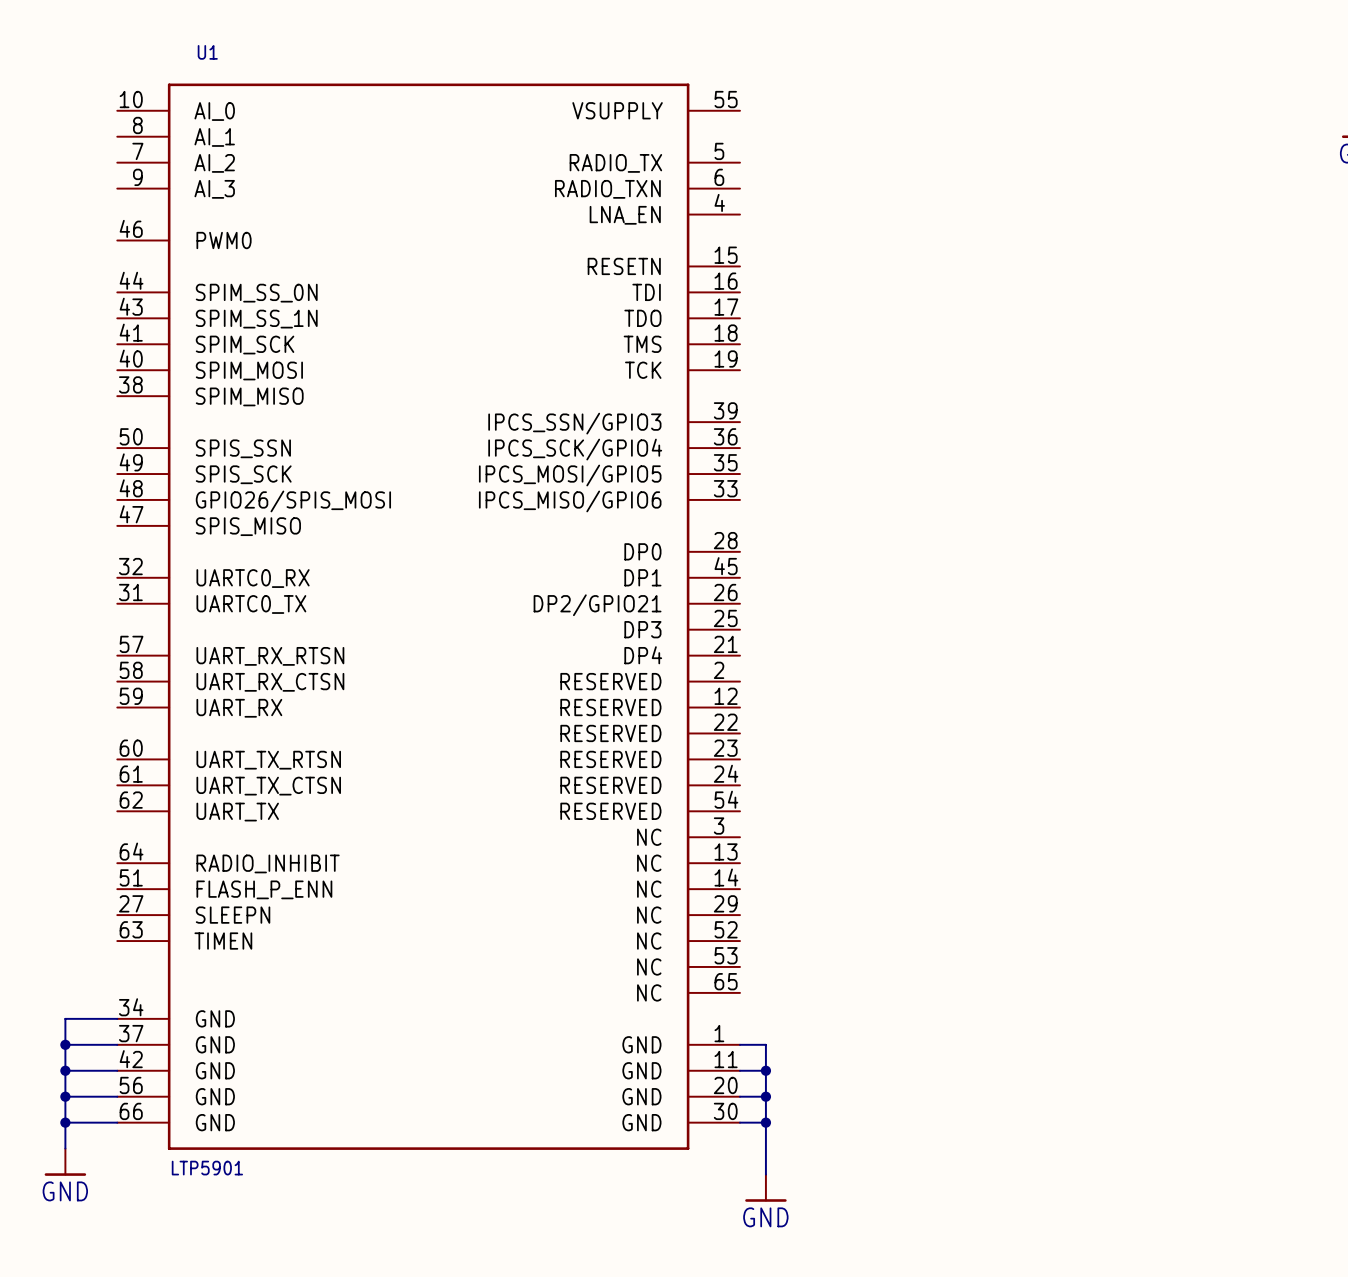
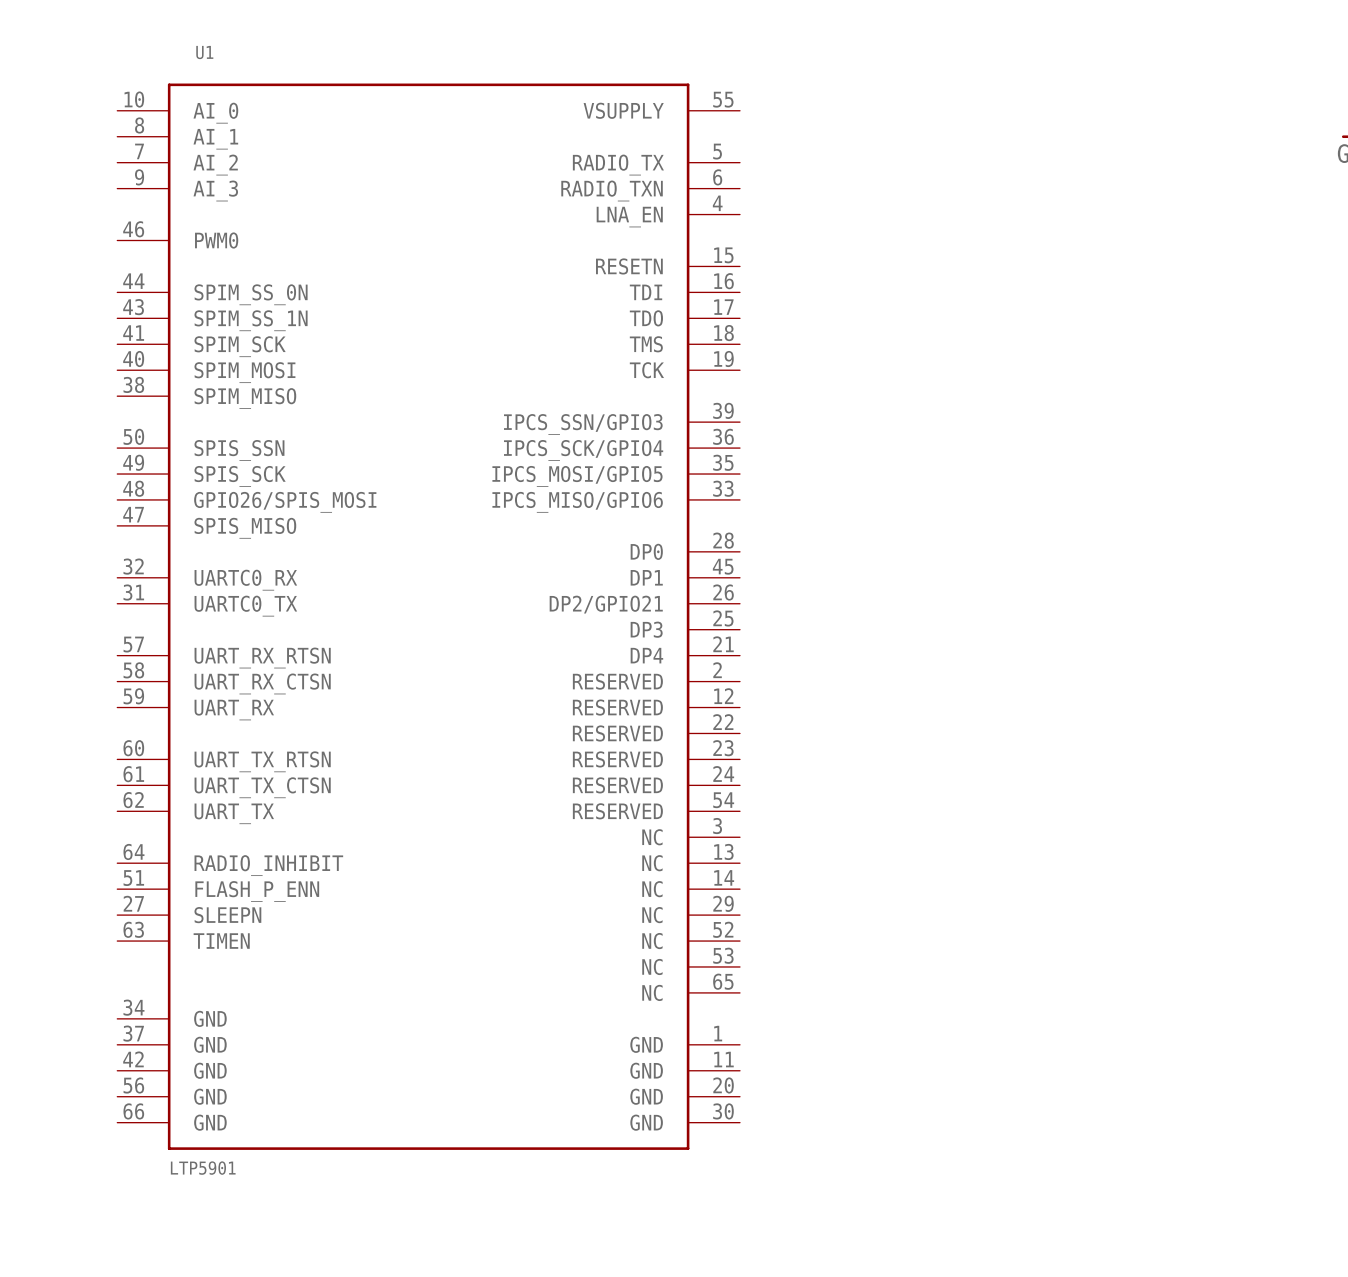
wire: (117, 1018) (65, 1018) (65, 1148) -> none
wire: (65, 1044) (117, 1044) -> none
junction: (65, 1044) -> none
wire: (739, 1044) (765, 1044) (765, 1174) -> none
wire: (65, 1070) (117, 1070) -> none
junction: (65, 1070) -> none
wire: (739, 1070) (765, 1070) -> none
junction: (765, 1070) -> none
wire: (65, 1096) (117, 1096) -> none
junction: (65, 1096) -> none
wire: (739, 1096) (765, 1096) -> none
junction: (765, 1096) -> none
wire: (65, 1122) (117, 1122) -> none
junction: (65, 1122) -> none
wire: (739, 1122) (765, 1122) -> none
junction: (765, 1122) -> none
power symbol: GND (65, 1162) -> none
power symbol: GND (765, 1188) -> none

